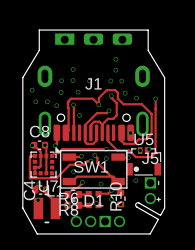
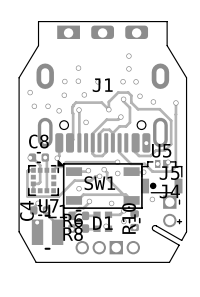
J4 name: none -> J4 (169, 191)

